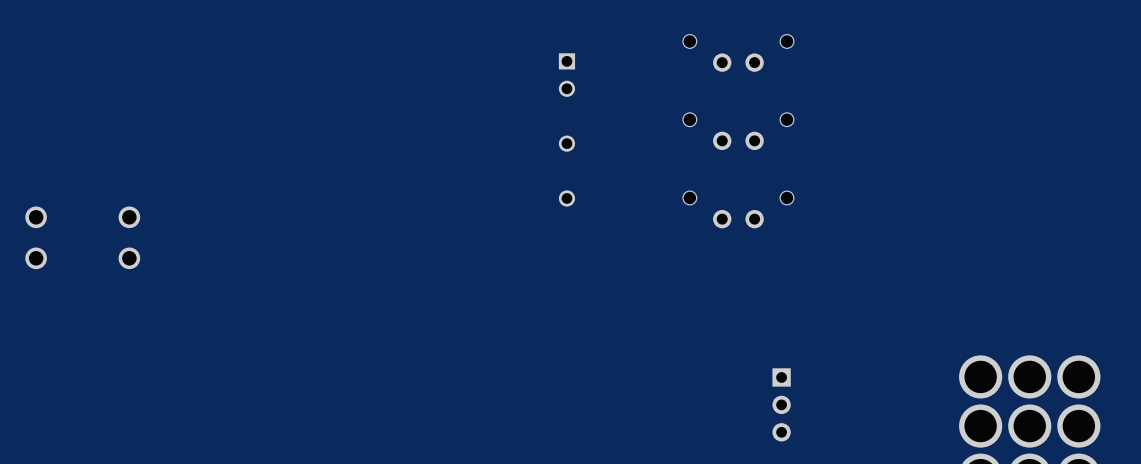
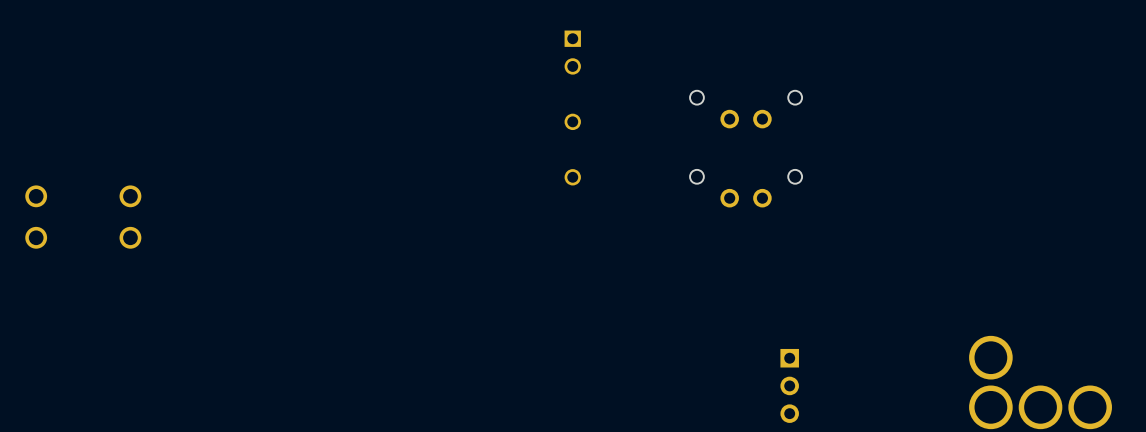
part: (738, 53) -> none
part: (1029, 376) -> none
part: (1078, 376) -> none

